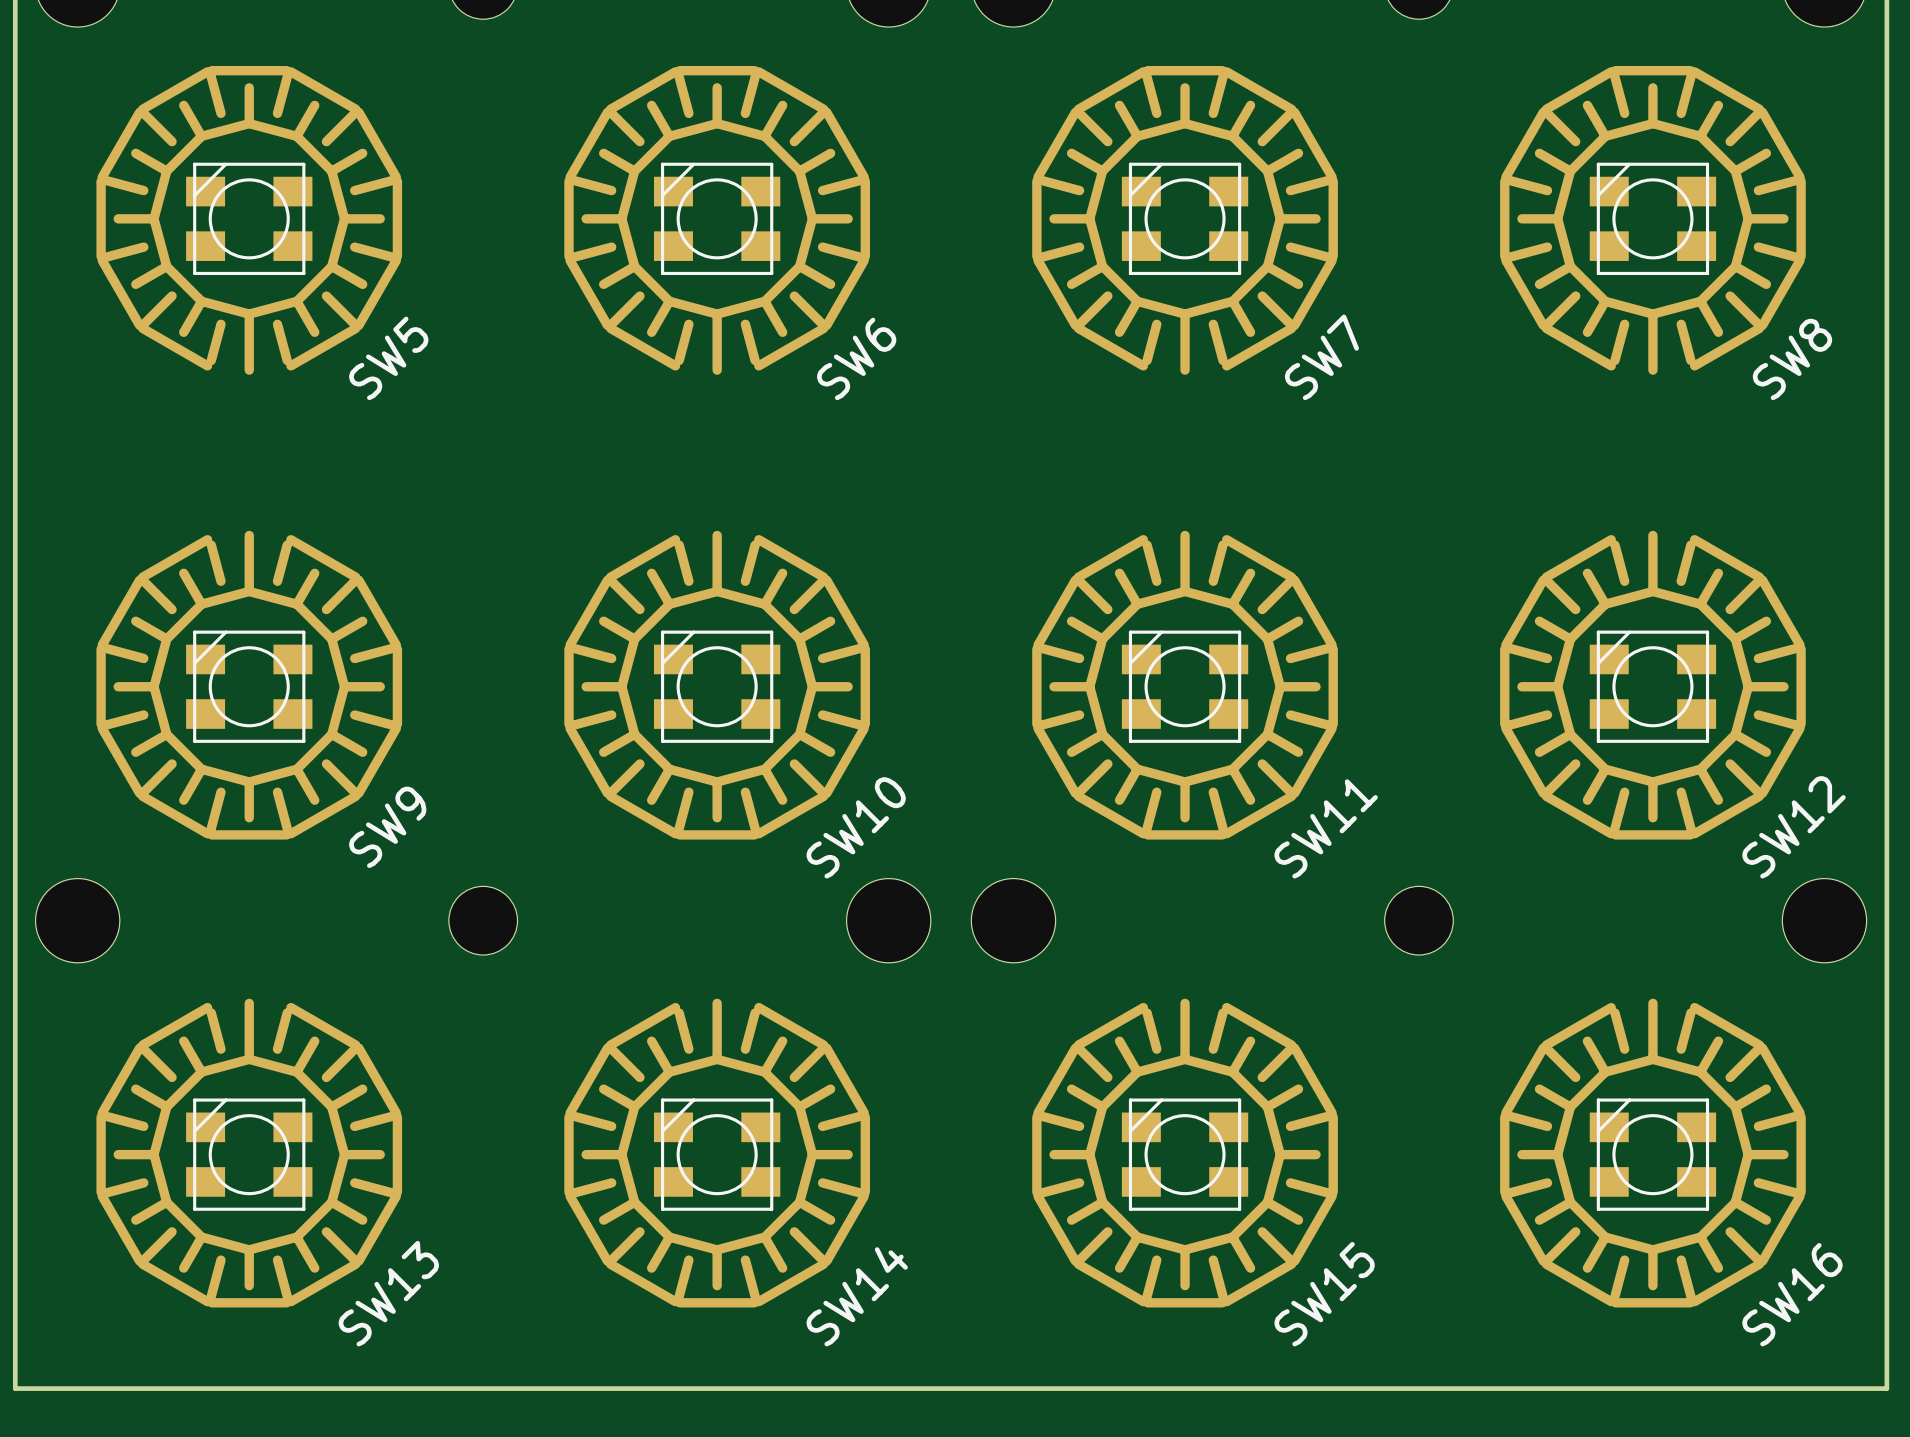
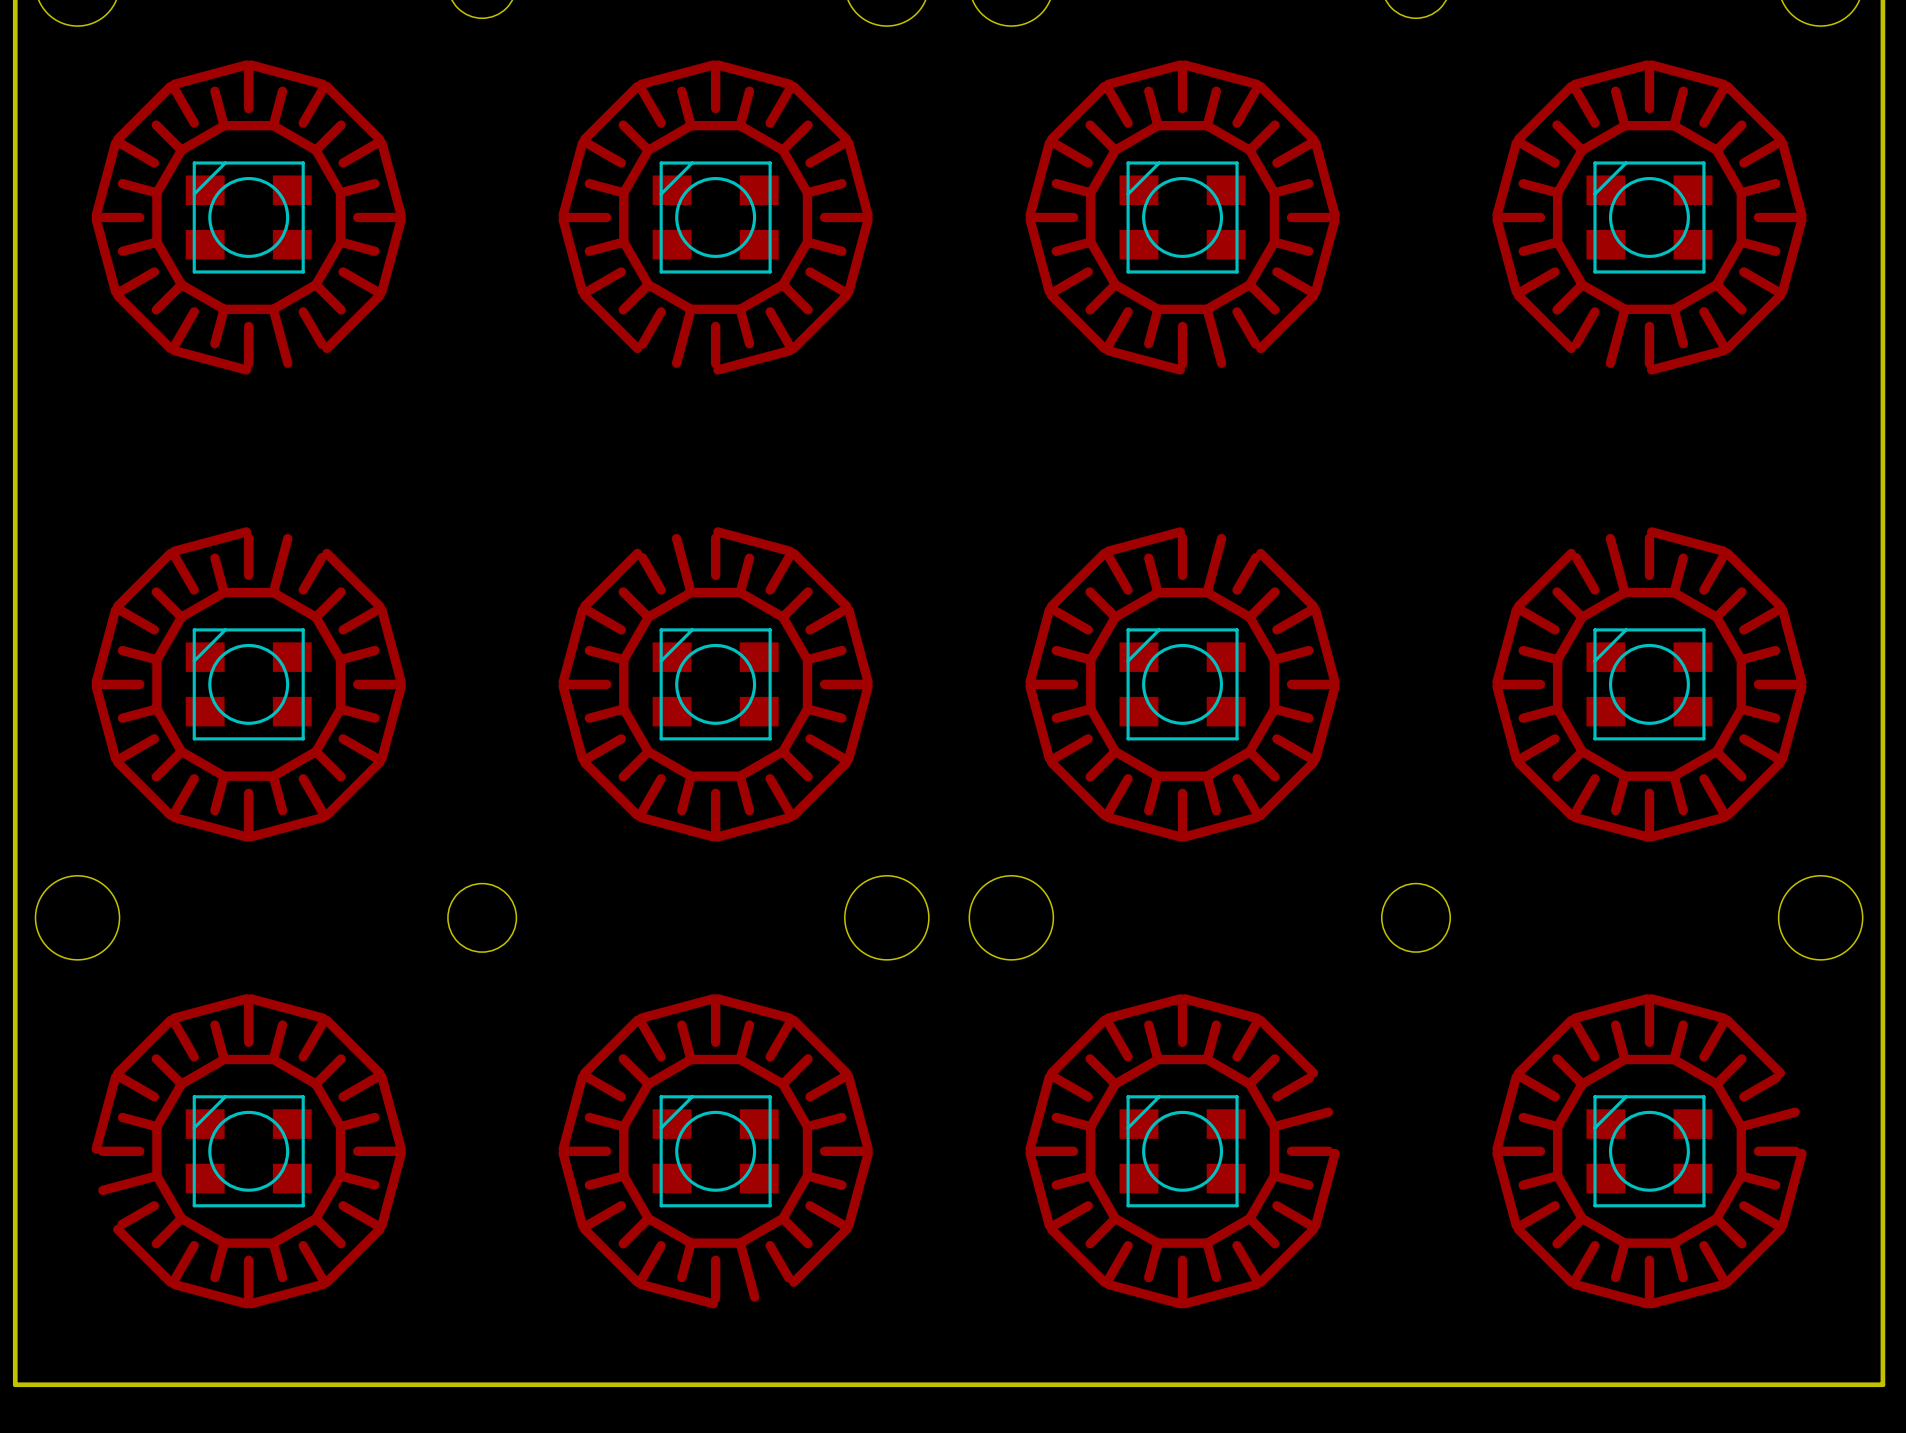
part: none -> (248, 217)
part: none -> (715, 217)
part: none -> (1182, 217)
part: none -> (1649, 217)
SW5: (249, 220) -> none
SW6: (717, 220) -> none
SW7: (1185, 220) -> none
SW8: (1652, 220) -> none
SW9: (249, 685) -> none
SW10: (717, 685) -> none
SW11: (1185, 685) -> none
SW12: (1652, 685) -> none
part: none -> (248, 684)
part: none -> (715, 684)
part: none -> (1182, 684)
part: none -> (1649, 684)
SW13: (249, 1153) -> none
SW14: (717, 1153) -> none
SW15: (1185, 1153) -> none
SW16: (1652, 1153) -> none
part: none -> (248, 1151)
part: none -> (715, 1151)
part: none -> (1182, 1151)
part: none -> (1649, 1151)

